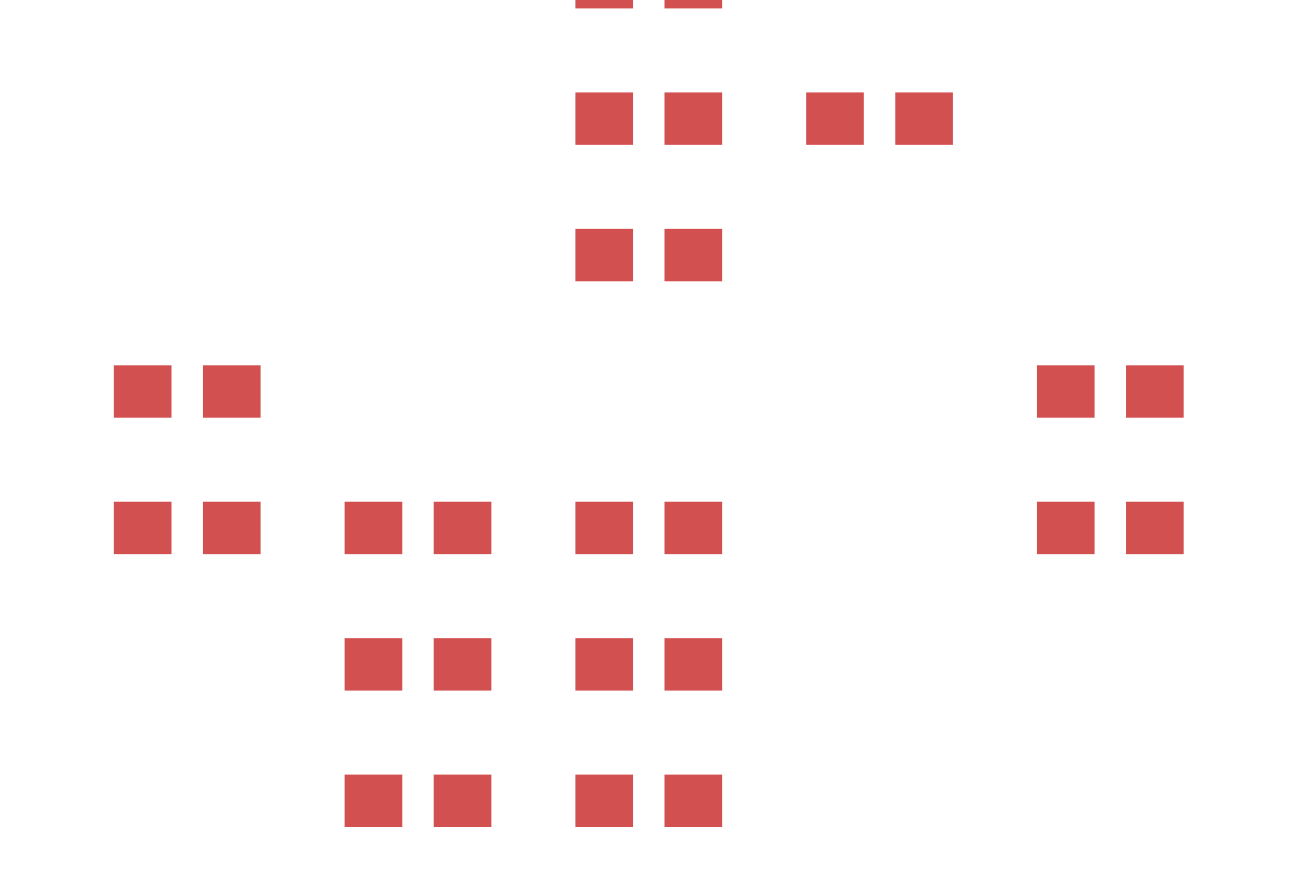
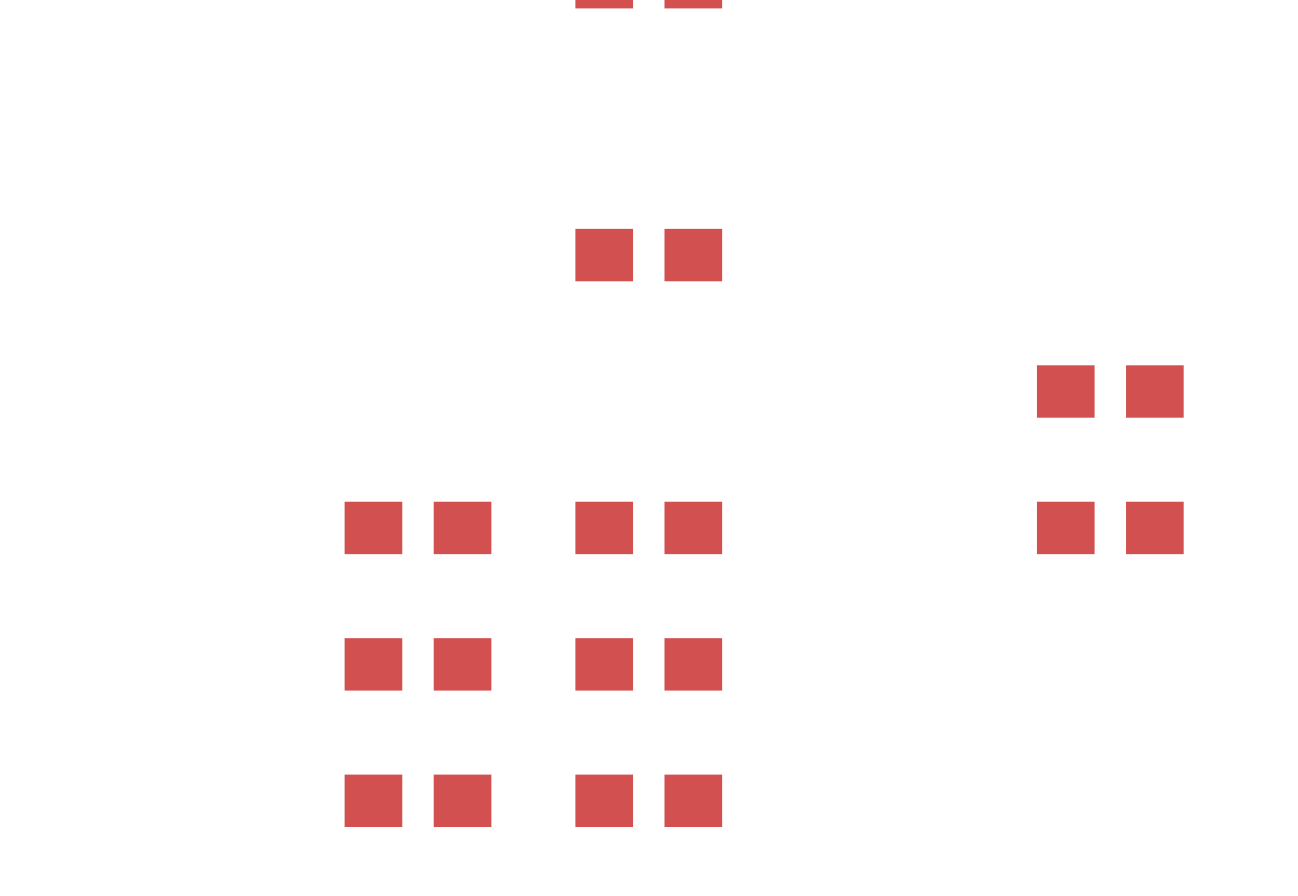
part: (648, 118) -> none
part: (879, 118) -> none
part: (187, 391) -> none
part: (187, 527) -> none

